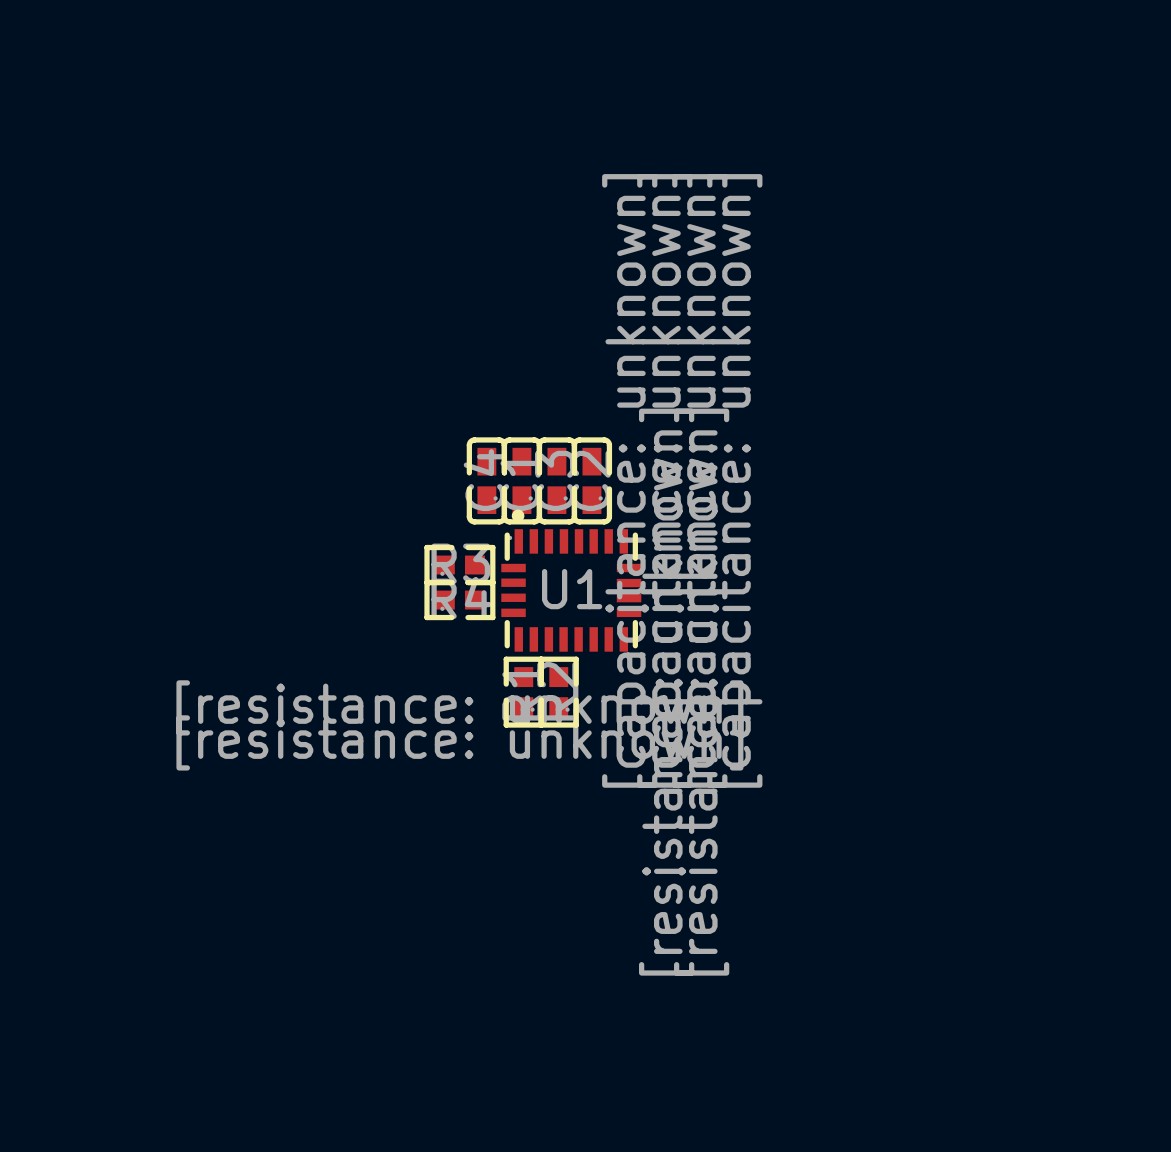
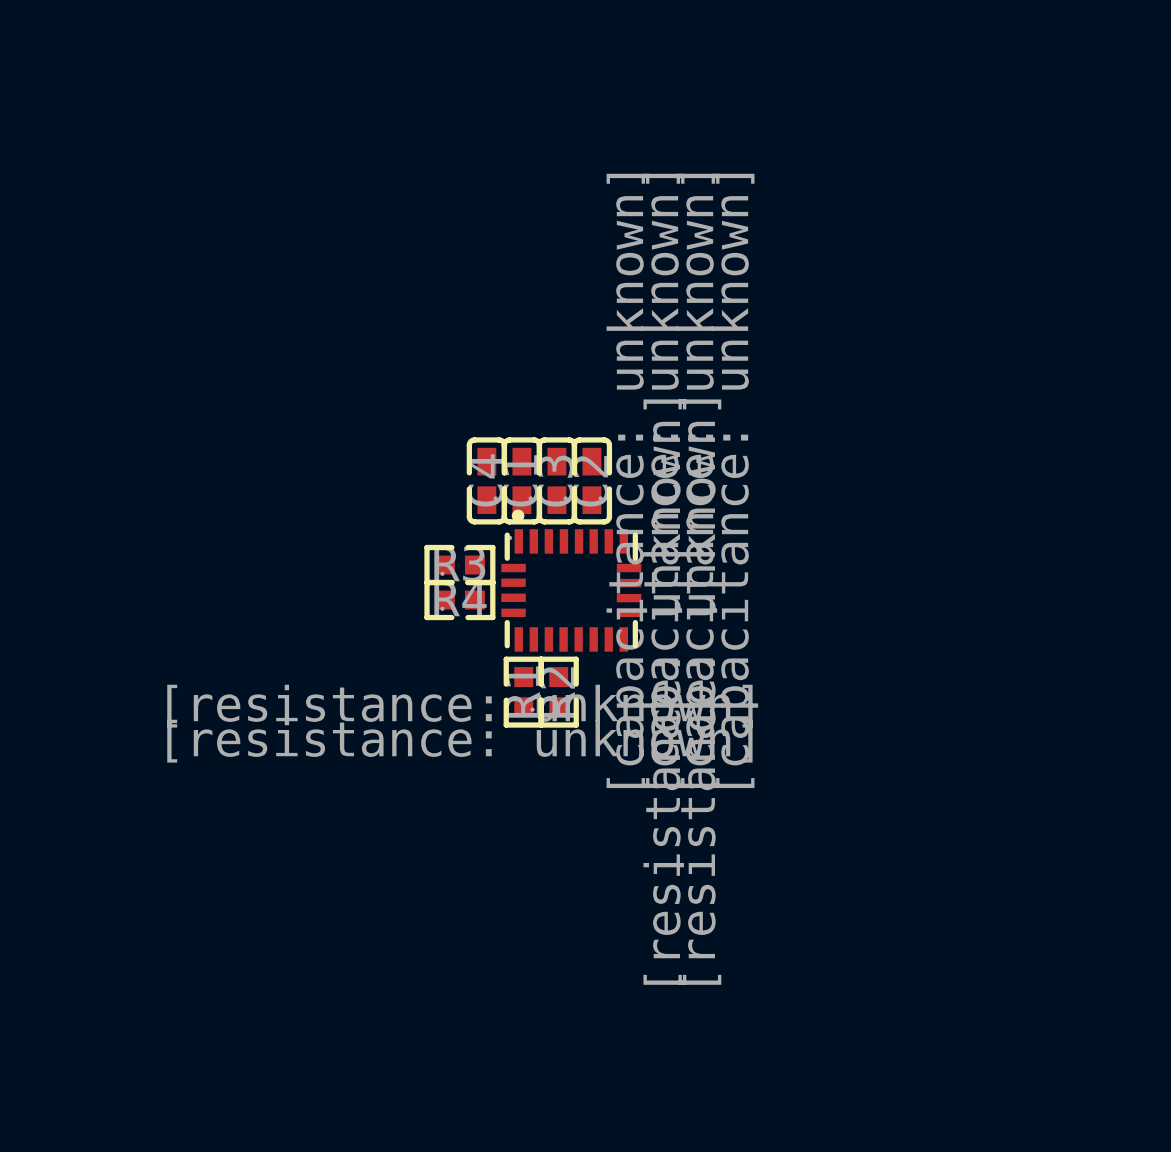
U1 name: U1 (572, 589) -> none

